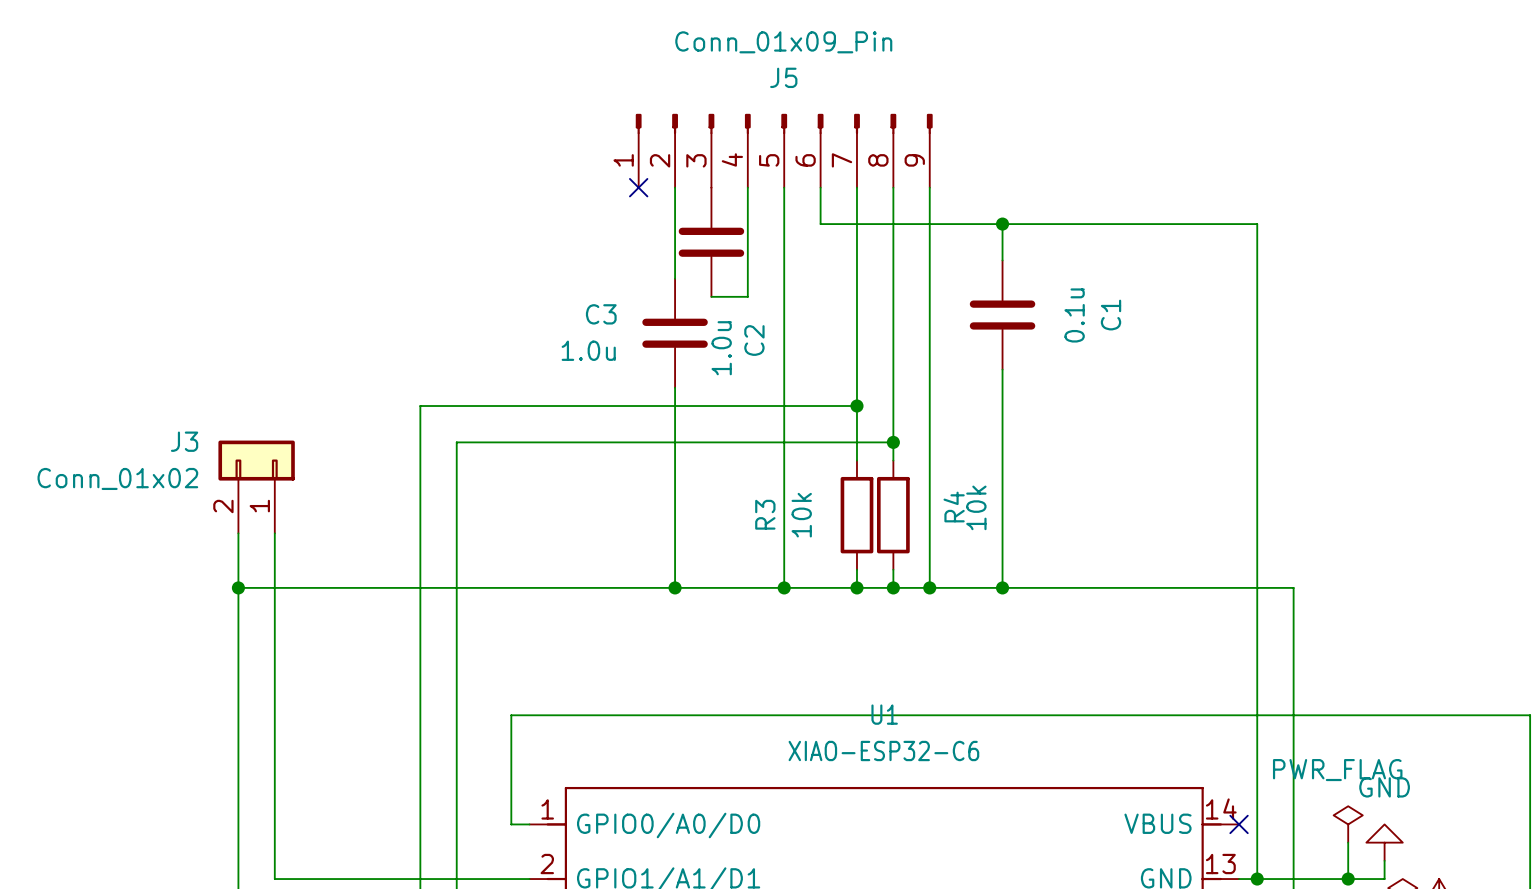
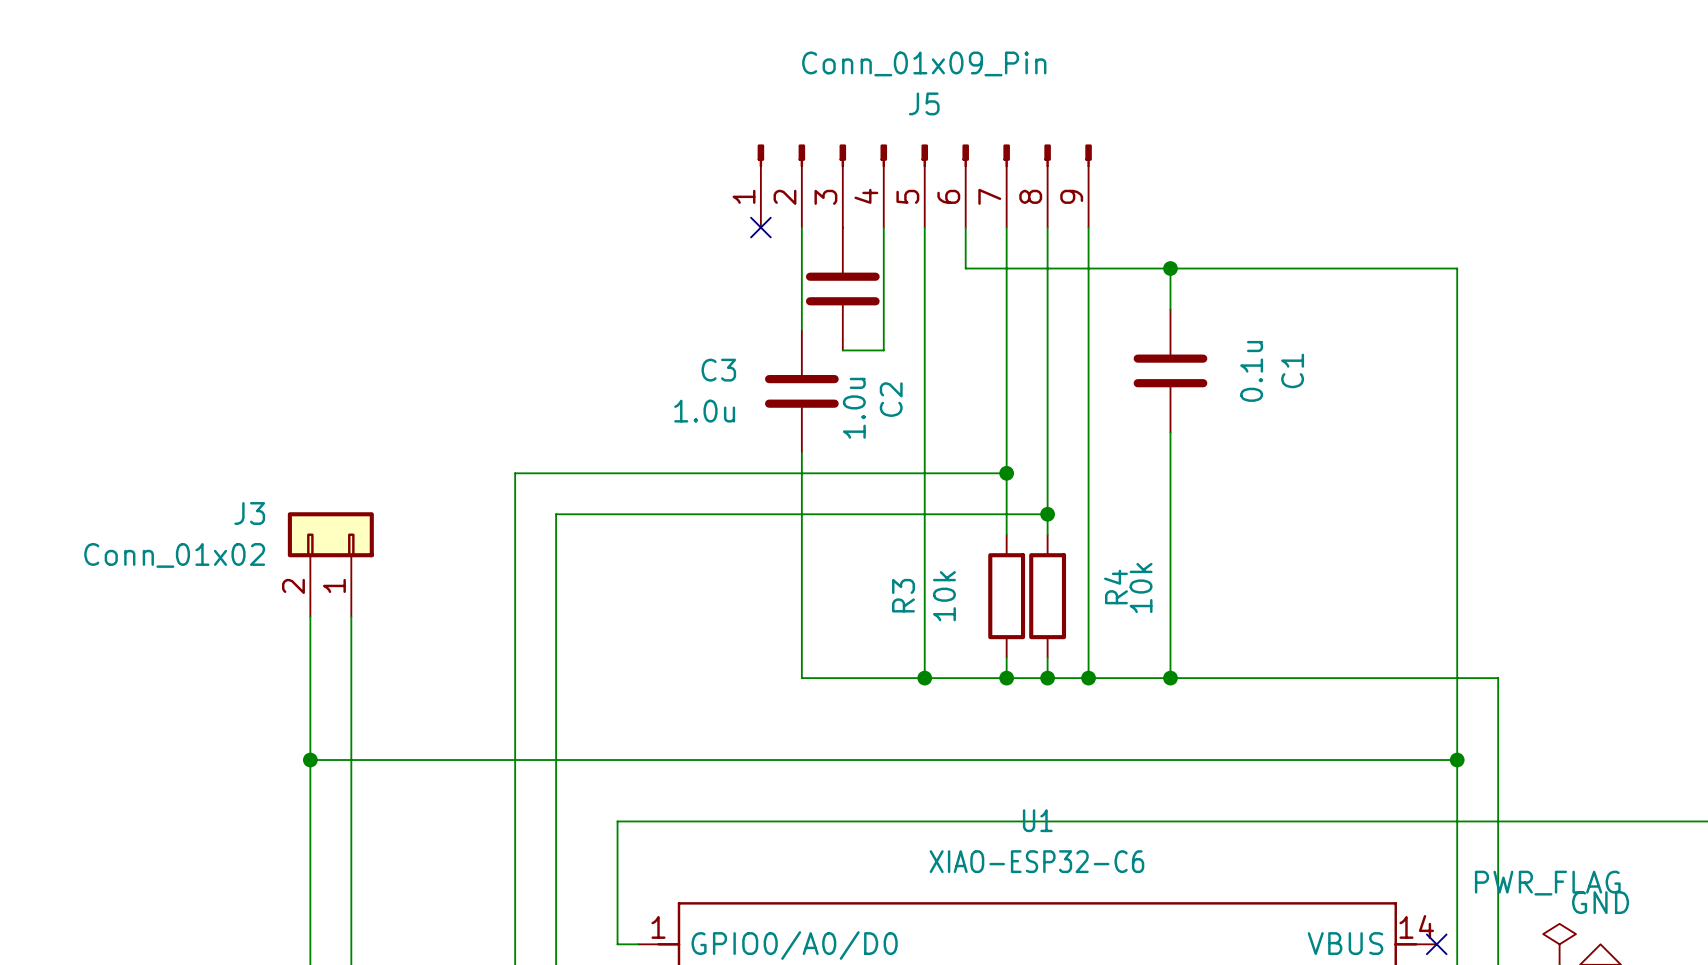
wire: (238, 587) (675, 587) -> none
junction position: (238, 587) -> (310, 760)
junction: (675, 587) -> none
wire: none -> (310, 760) (1457, 760)
junction: none -> (1457, 760)

